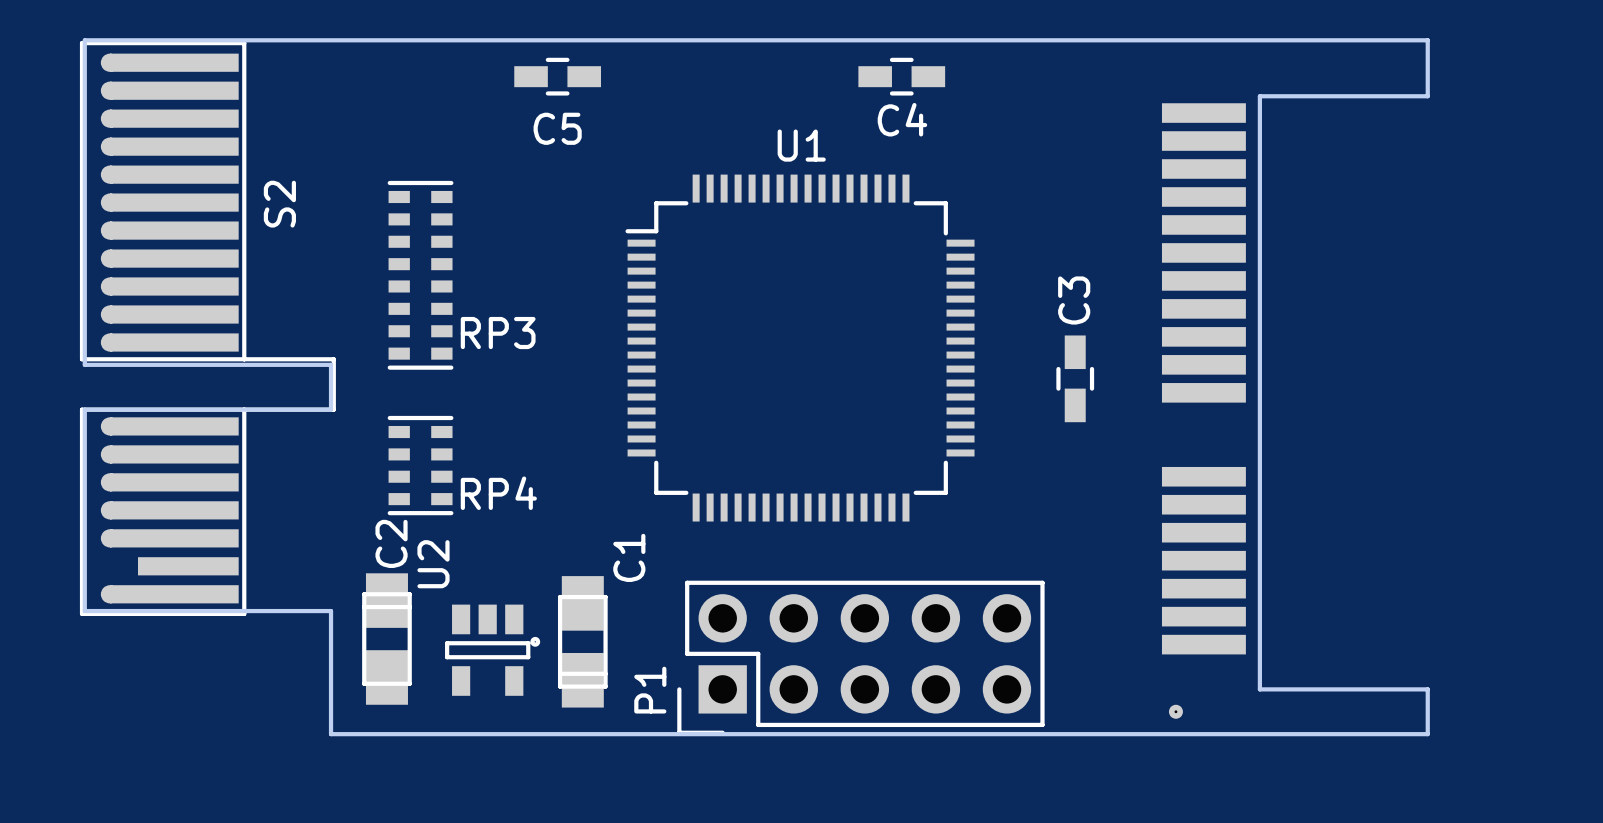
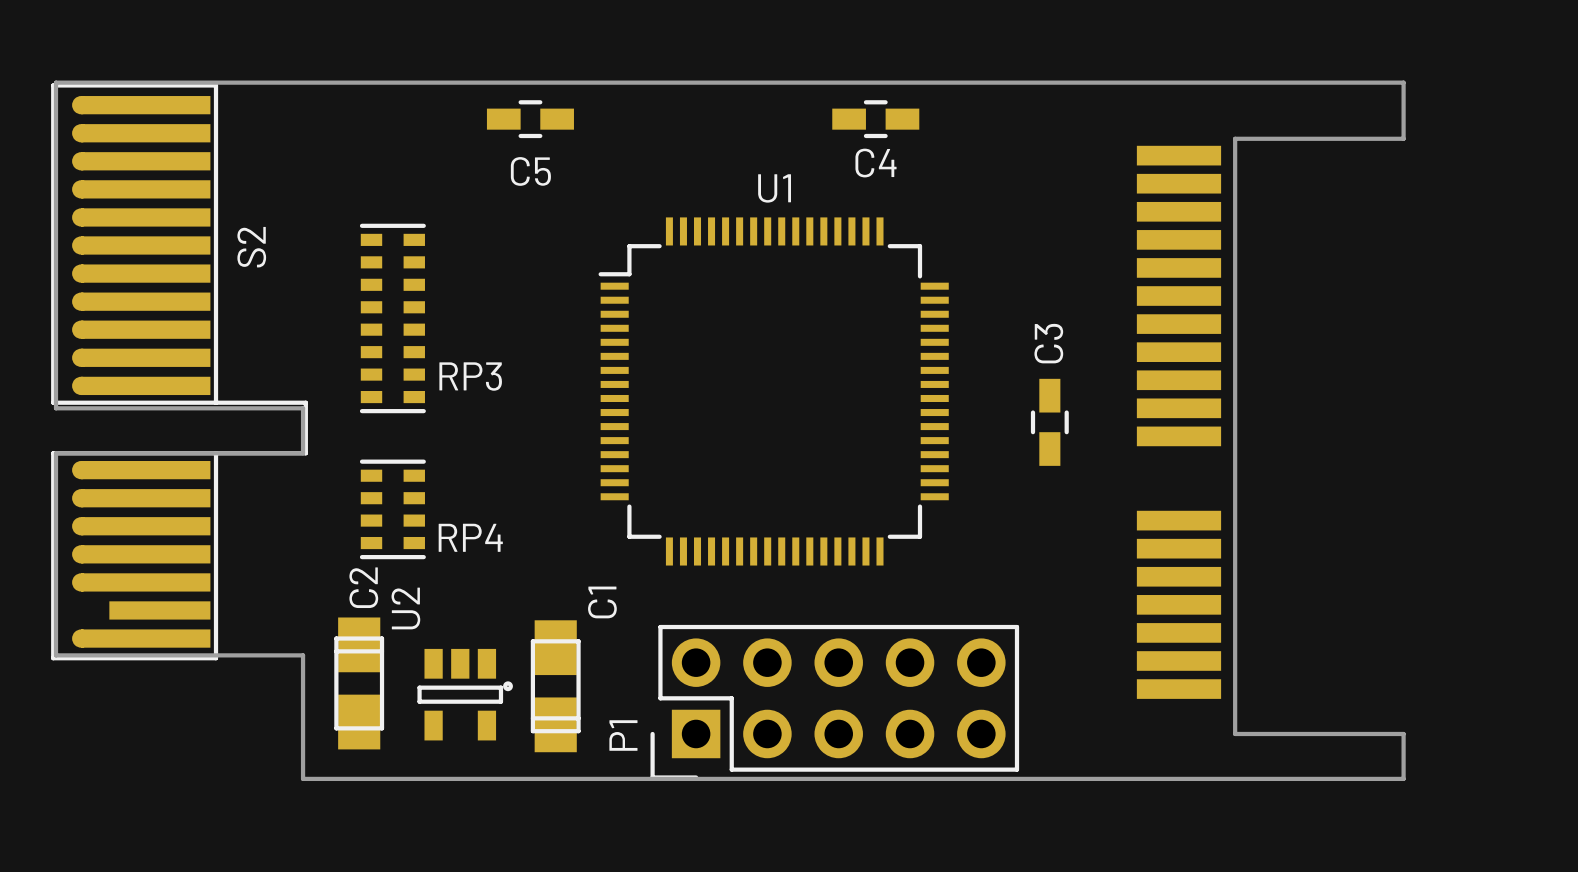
part: (1175, 711) -> none

